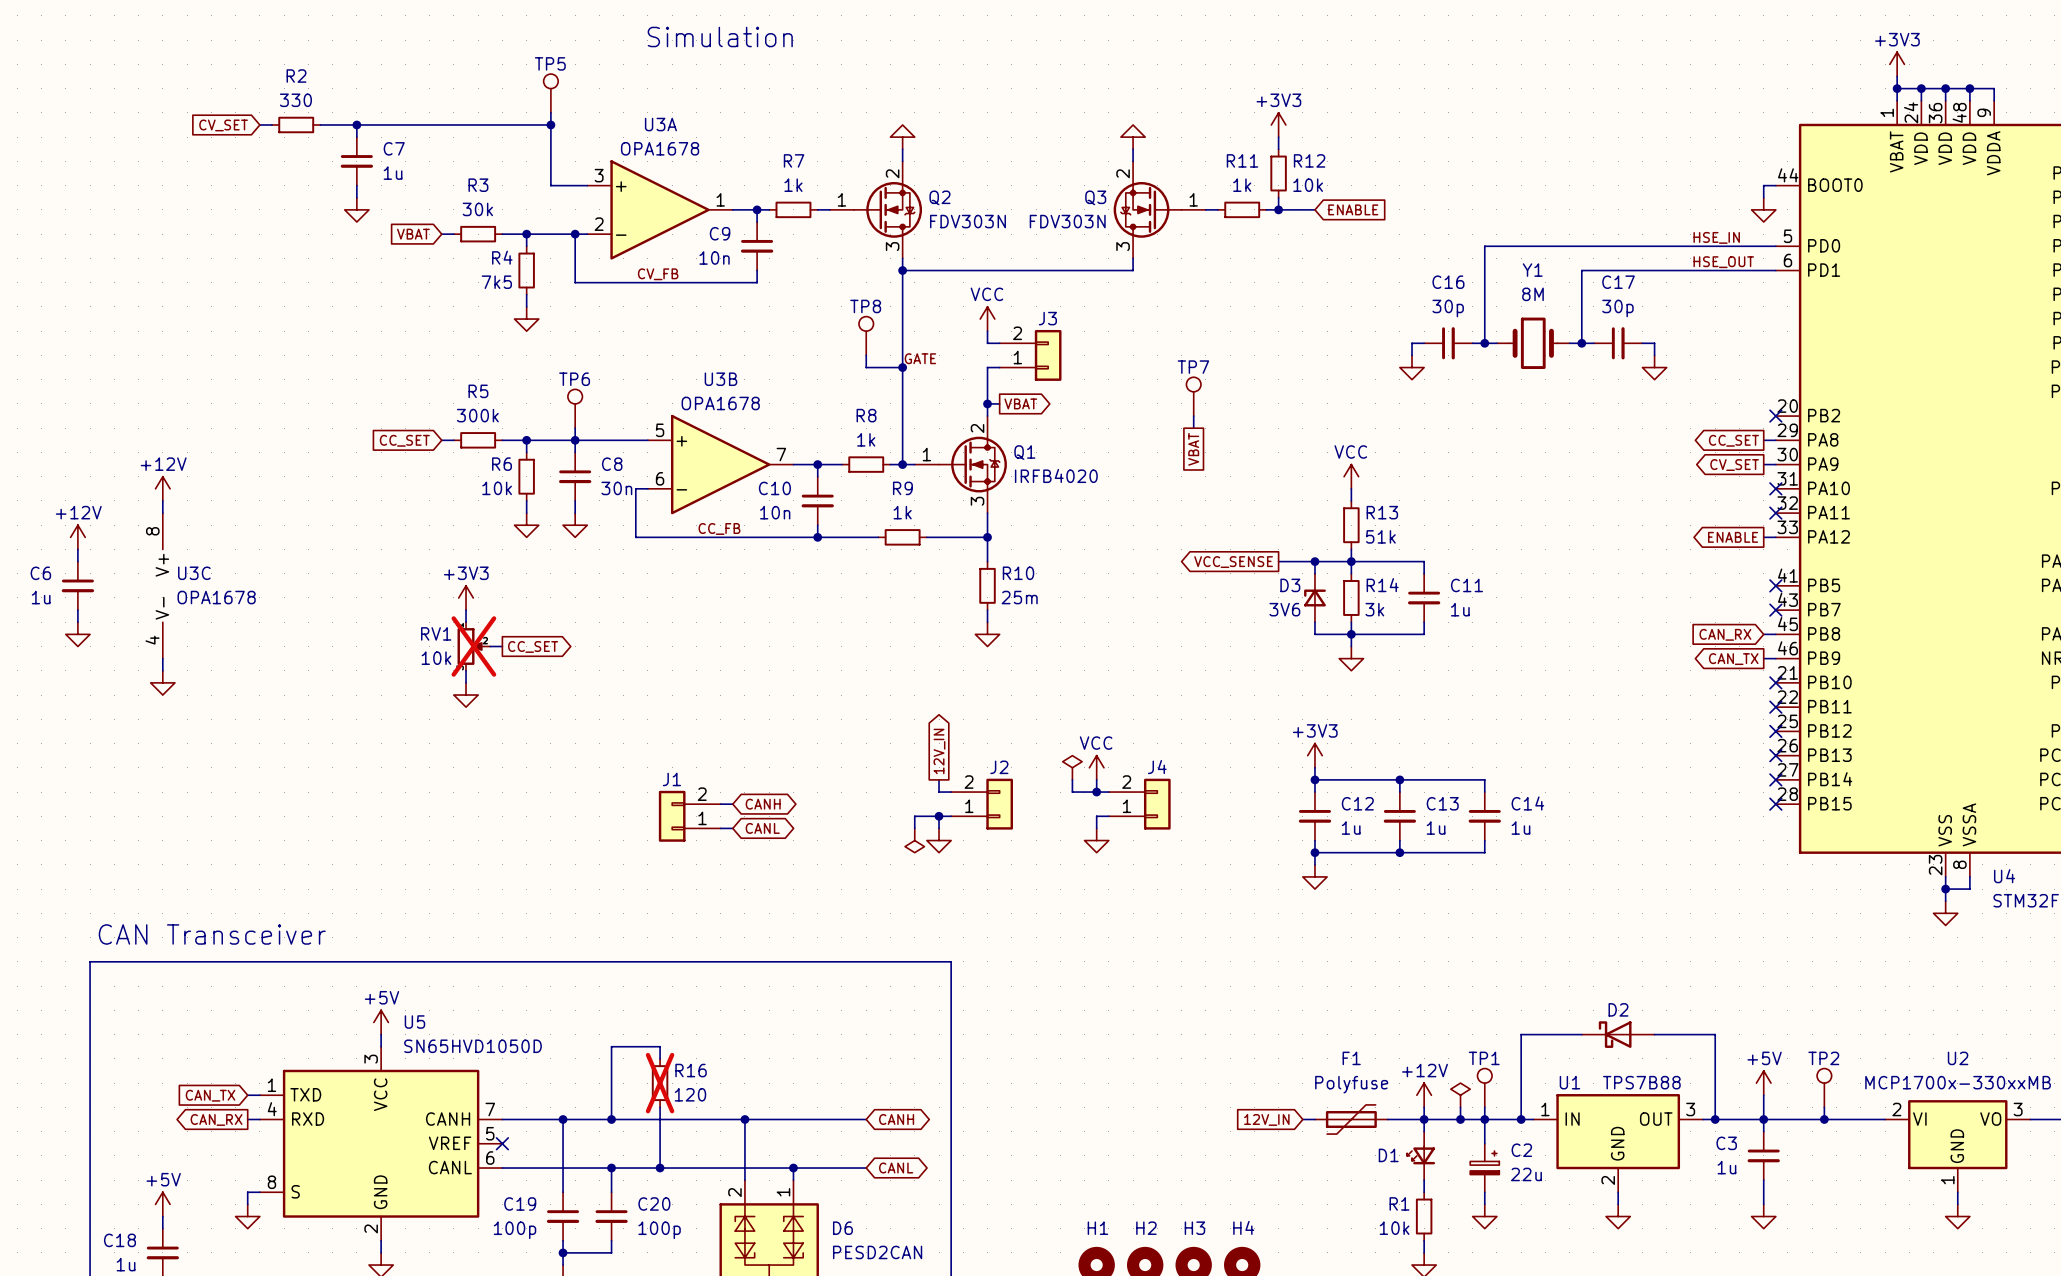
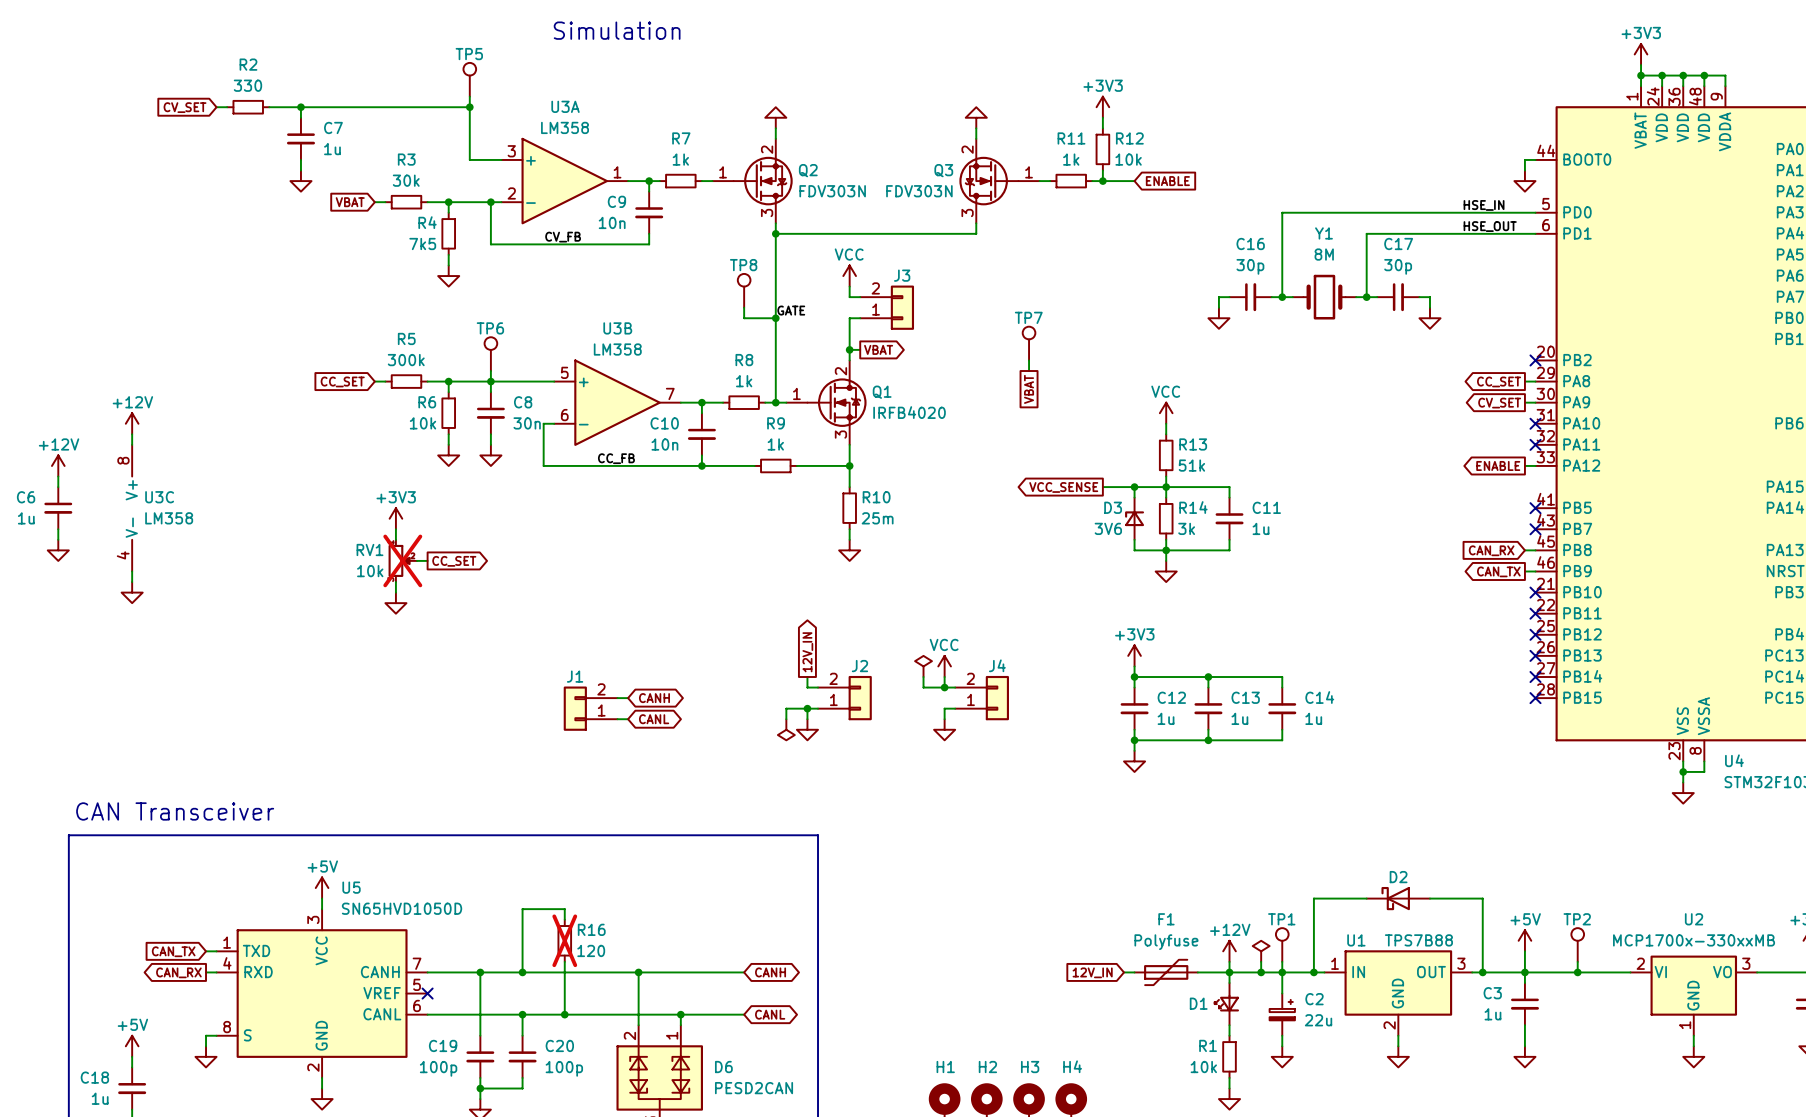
U3A value: OPA1678 (660, 148) -> LM358 (565, 127)
U3B value: OPA1678 (720, 403) -> LM358 (617, 349)
U3C value: OPA1678 (216, 597) -> LM358 (169, 518)

